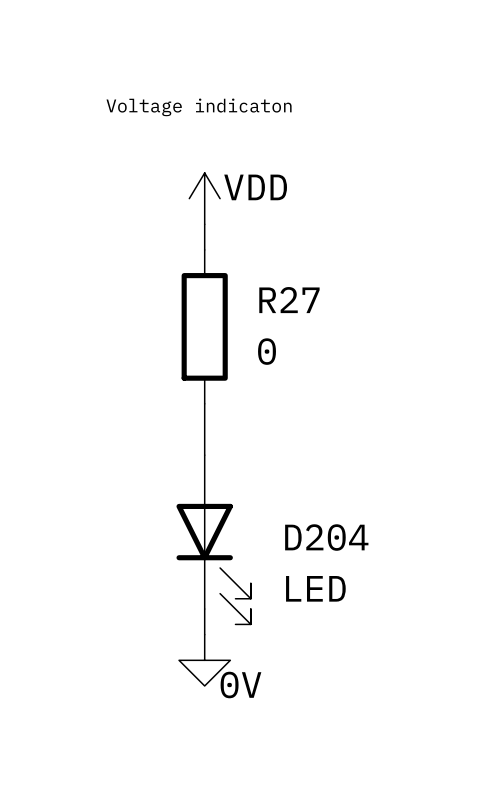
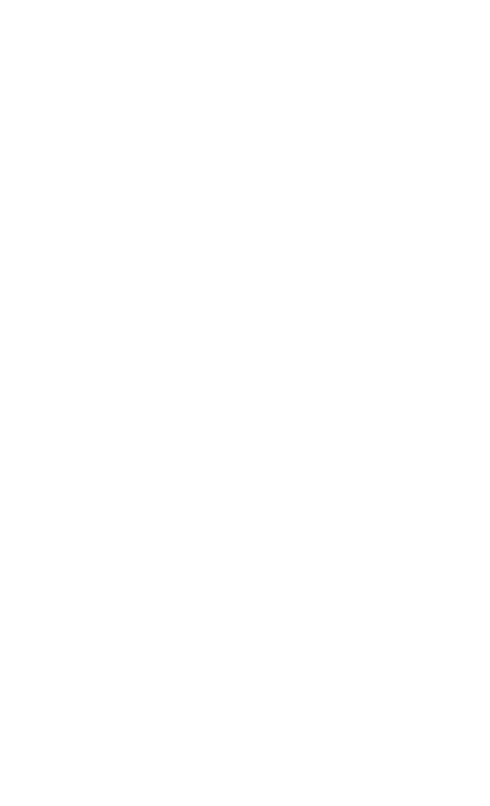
text: Voltage indicaton (199, 107) -> none
power symbol: VDD (204, 198) -> none
wire: (204, 224) (204, 249) -> none
R27: 0 (204, 326) -> none
wire: (204, 403) (204, 455) -> none
D204: LED (213, 539) -> none
wire: (204, 609) (204, 634) -> none
power symbol: 0V (204, 660) -> none

